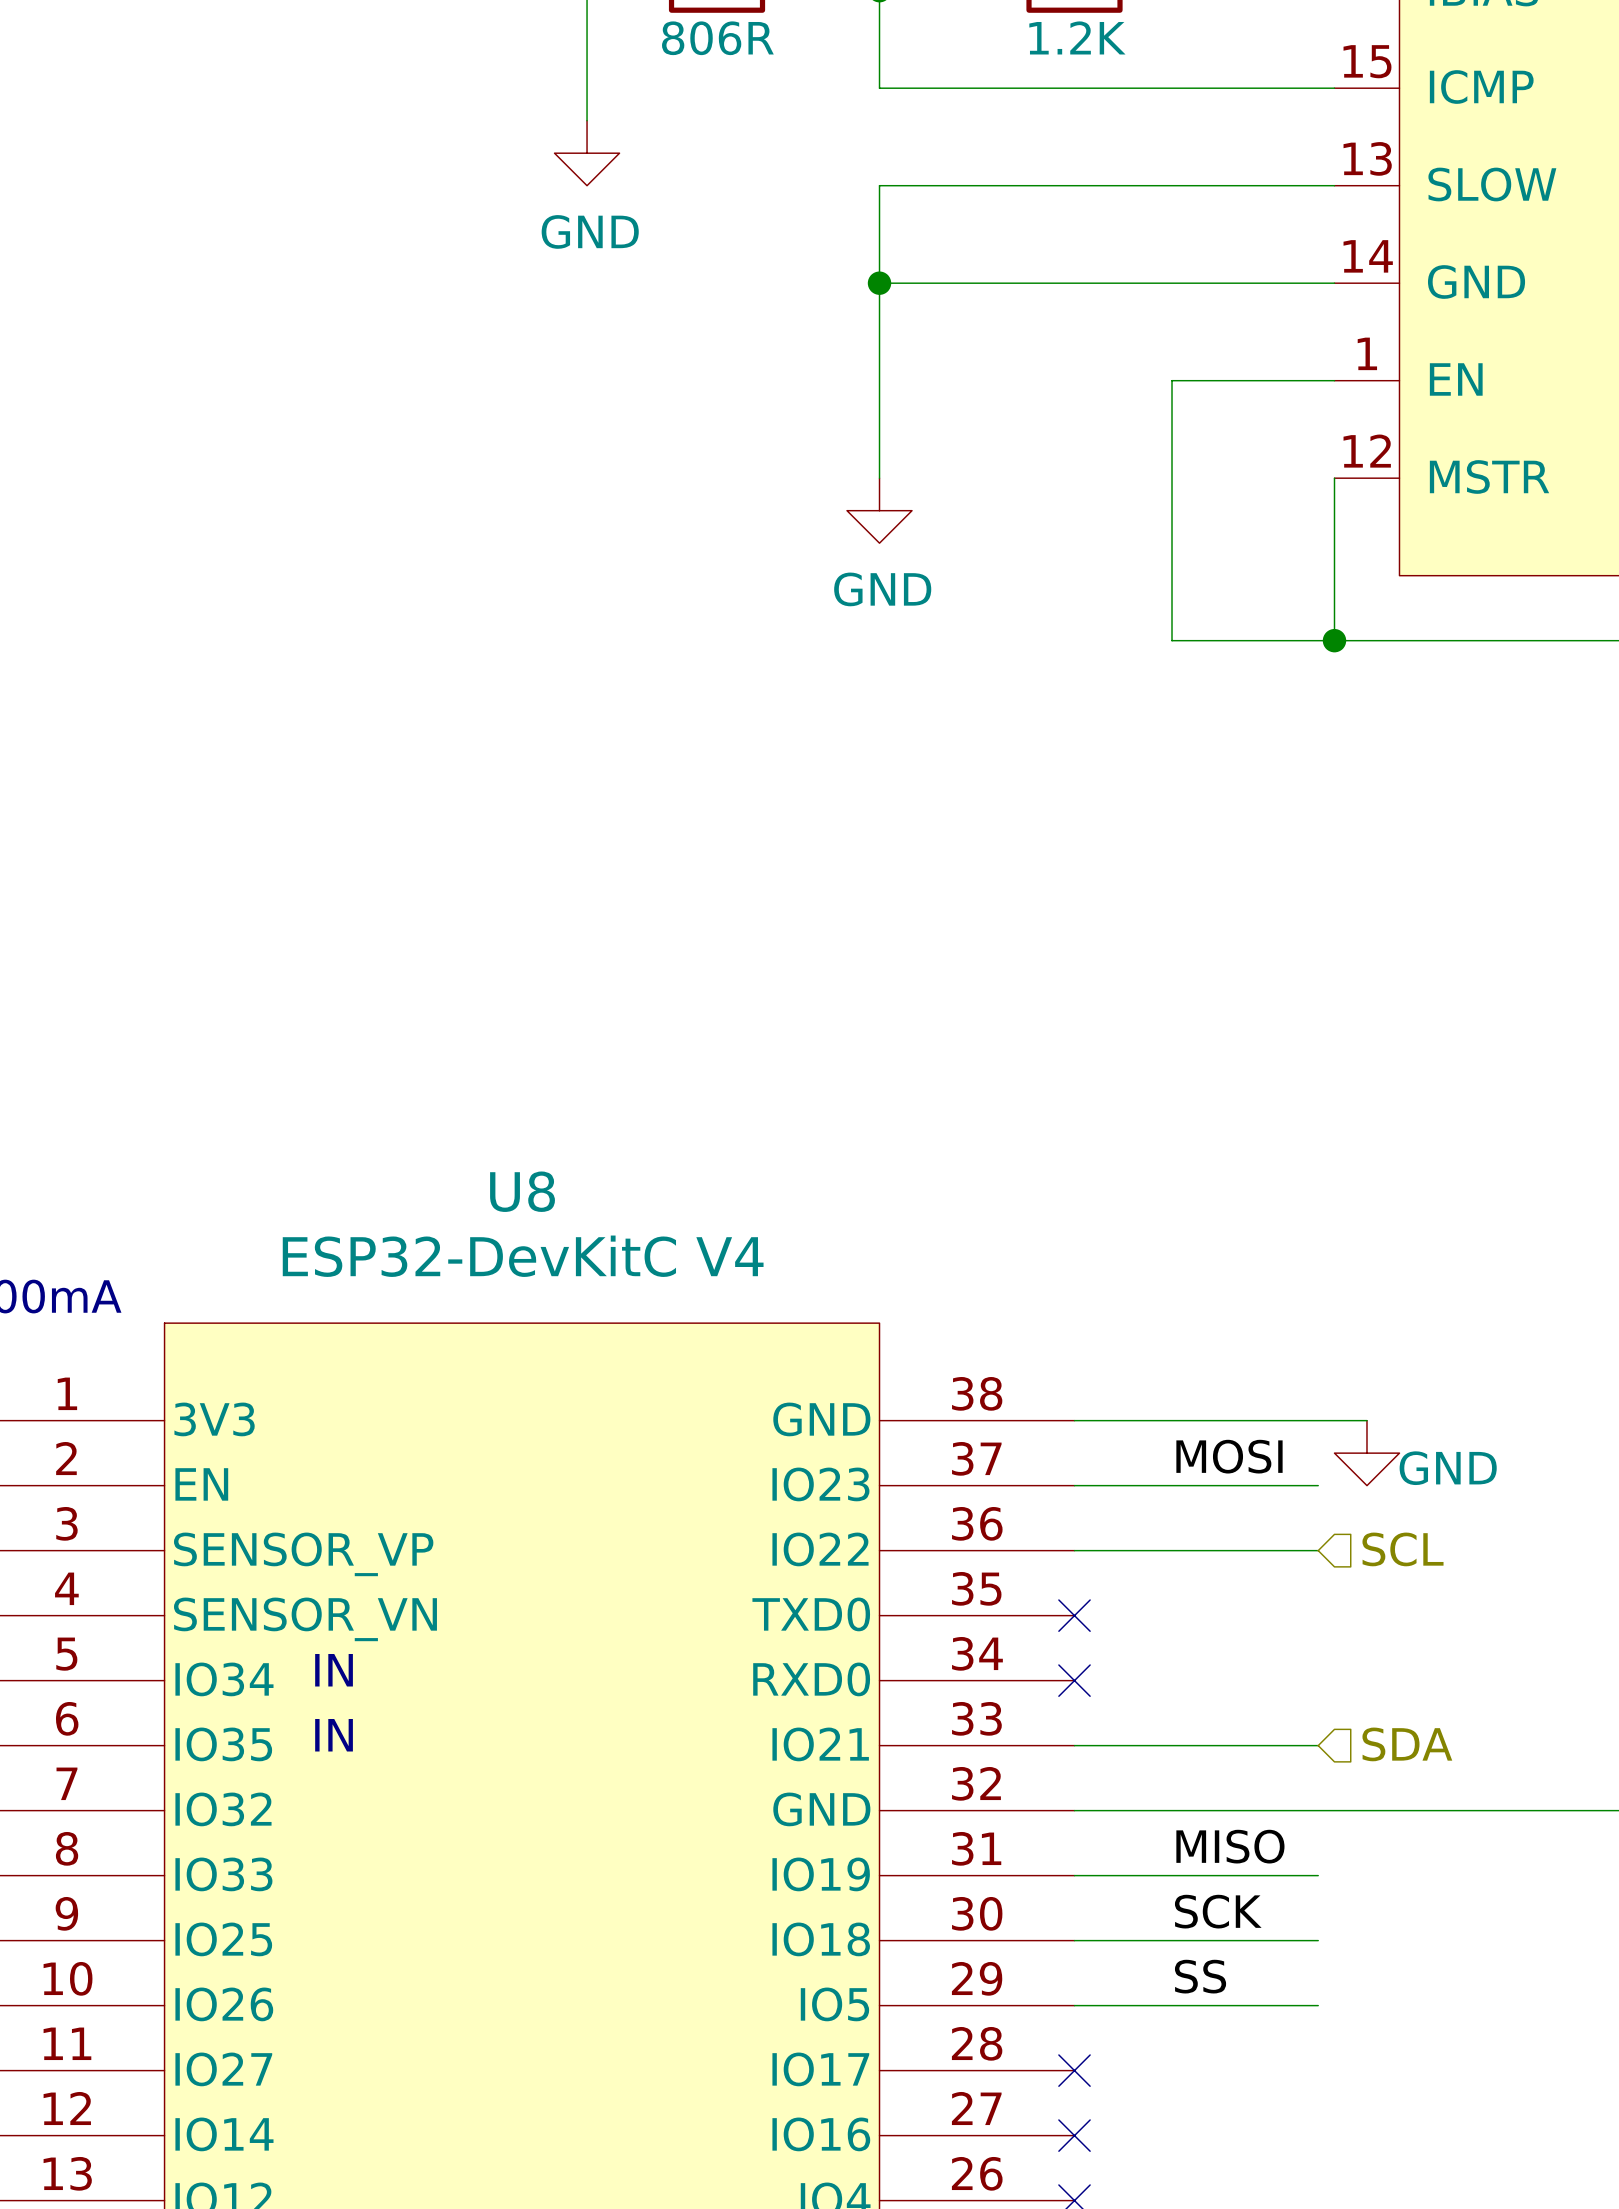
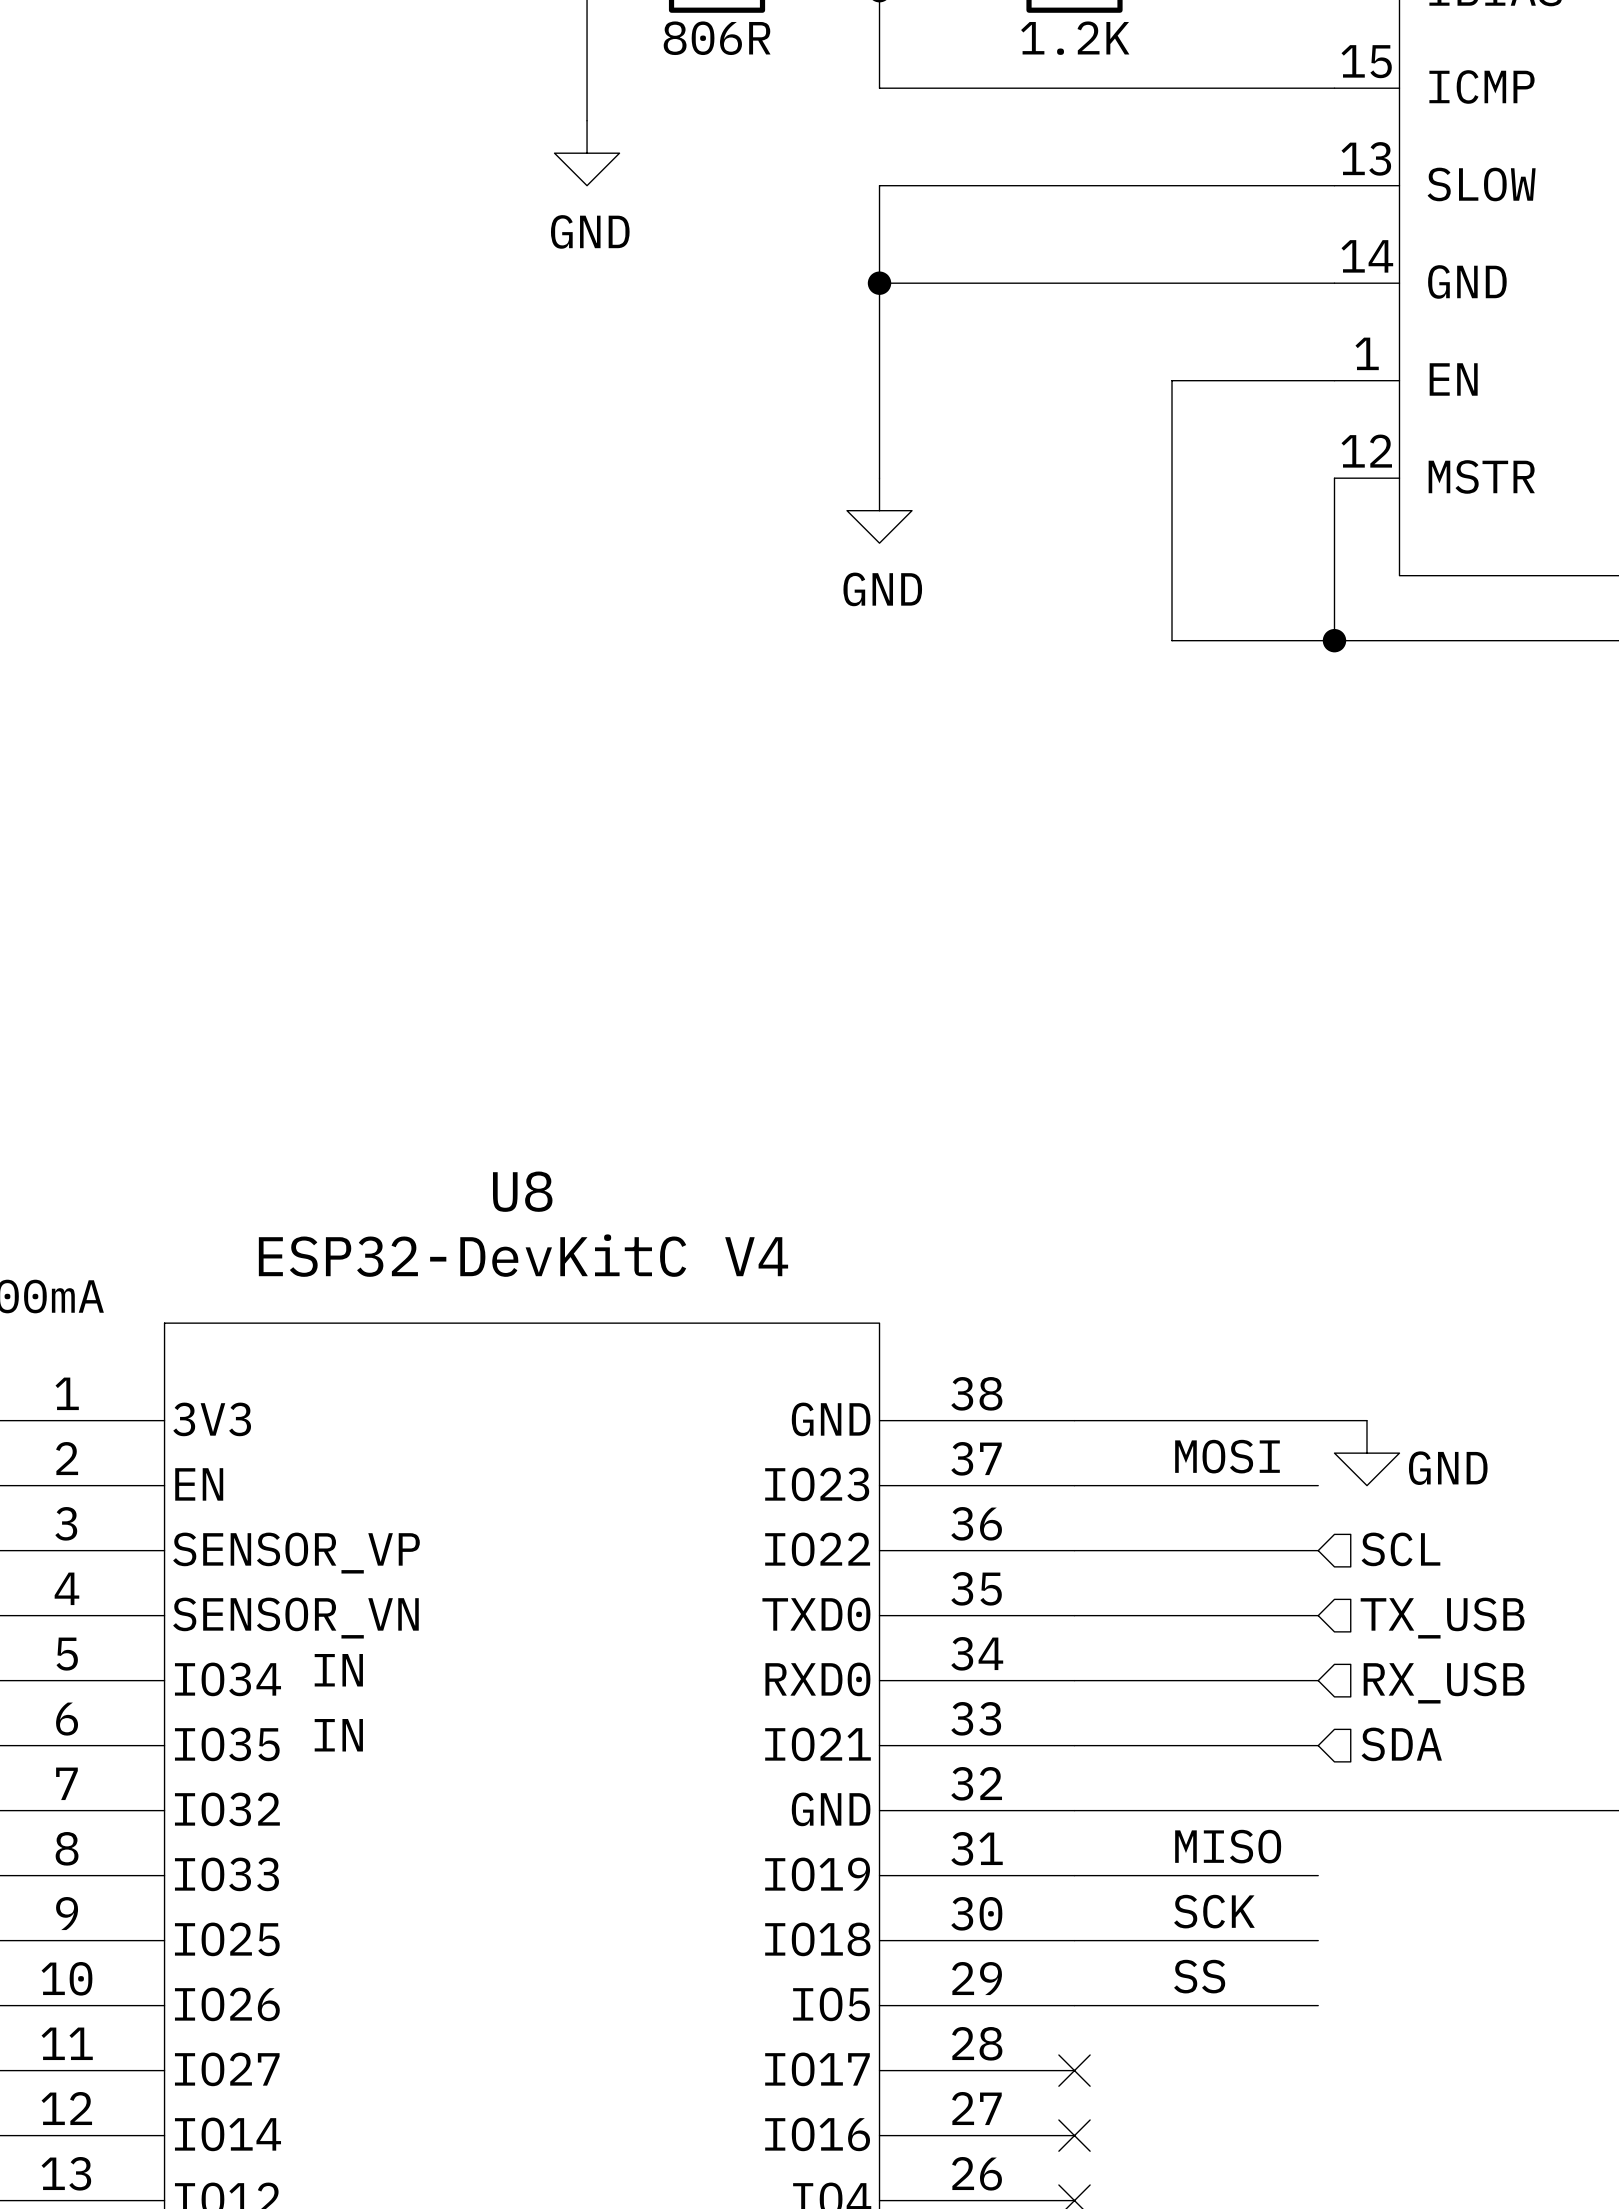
wire: none -> (1074, 1615) (1318, 1615)
no-connect mark: (1074, 1615) -> none
hierarchical label: none -> TX_USB (1442, 1618)
wire: none -> (1074, 1680) (1318, 1680)
no-connect mark: (1074, 1680) -> none
hierarchical label: none -> RX_USB (1444, 1683)

